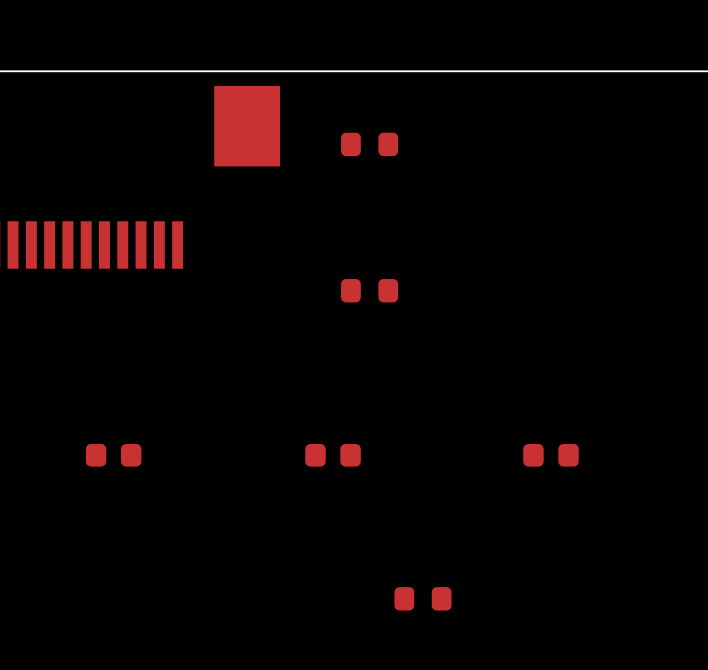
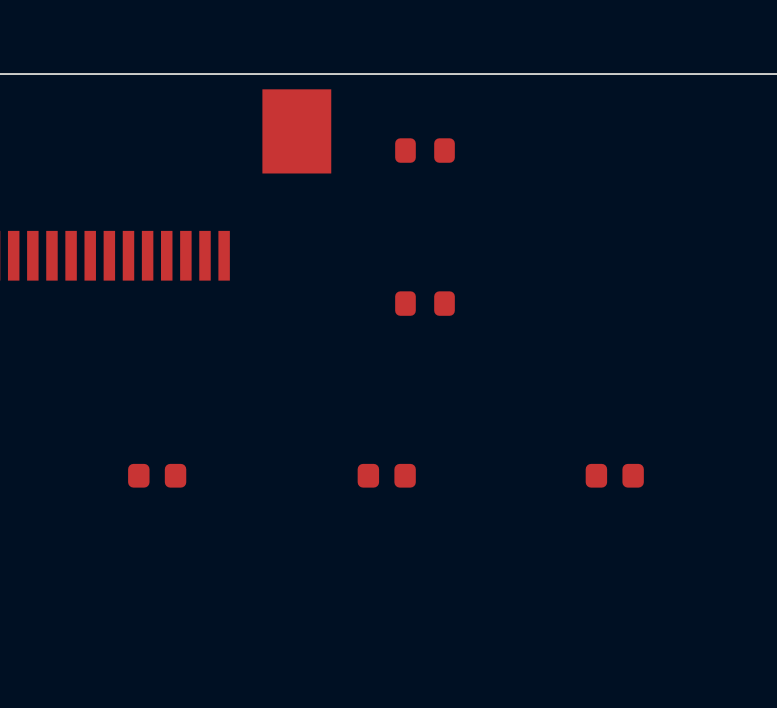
part: (423, 598) -> none

